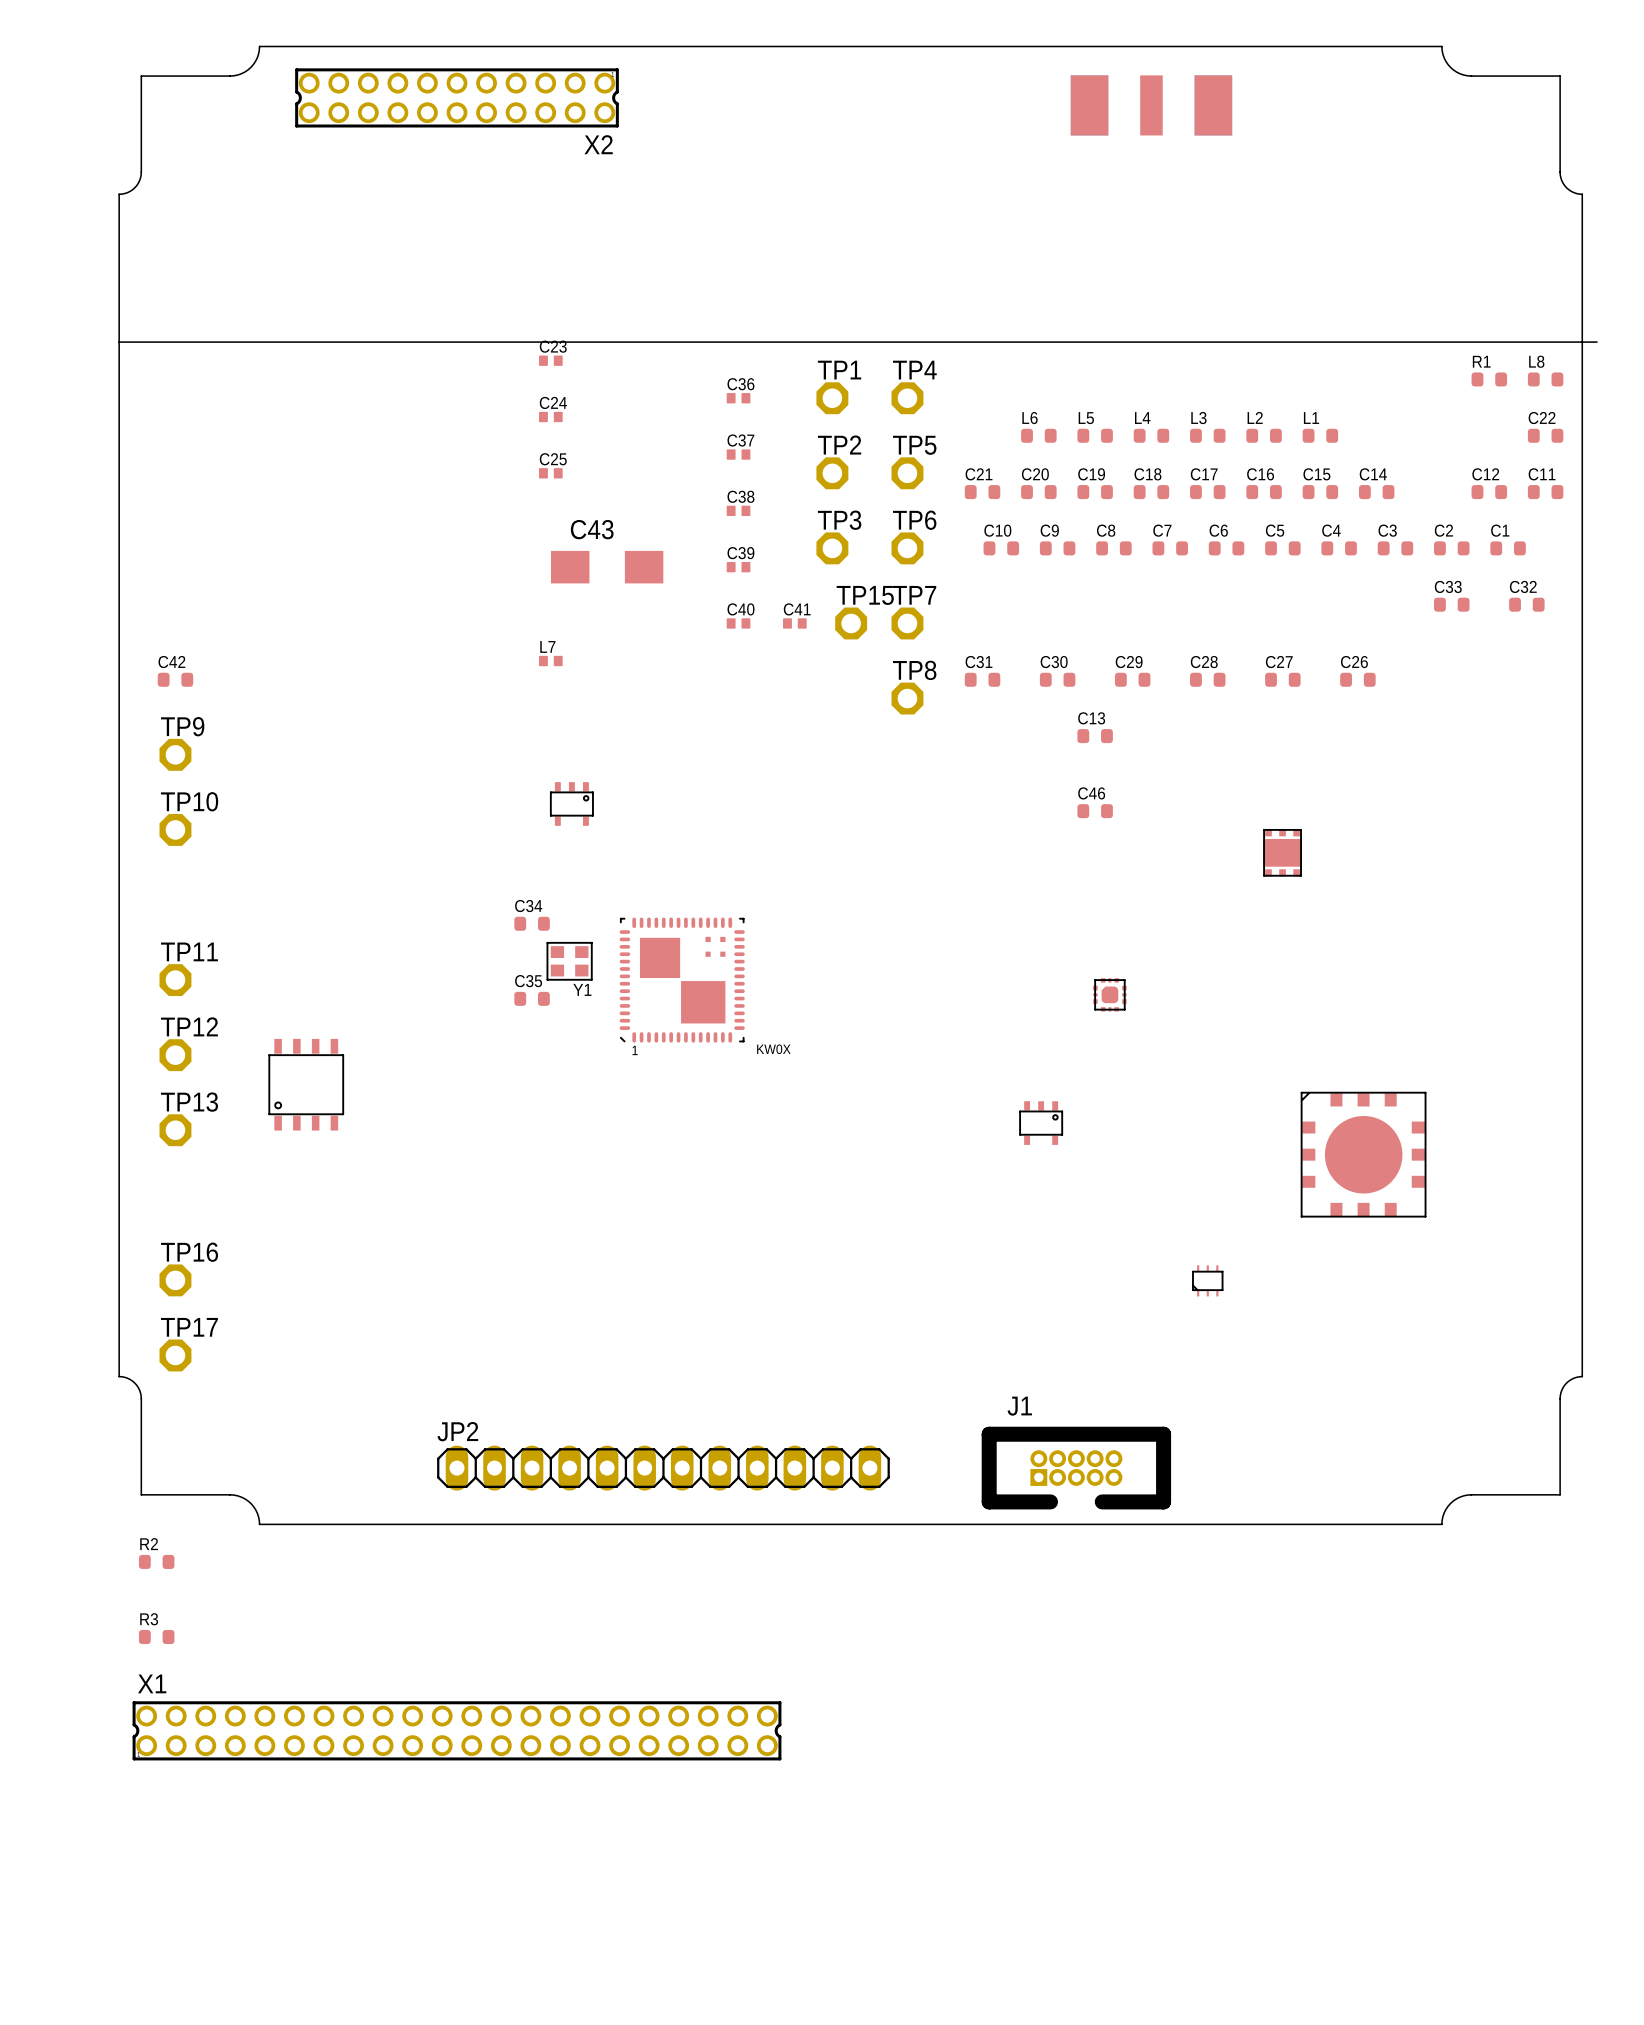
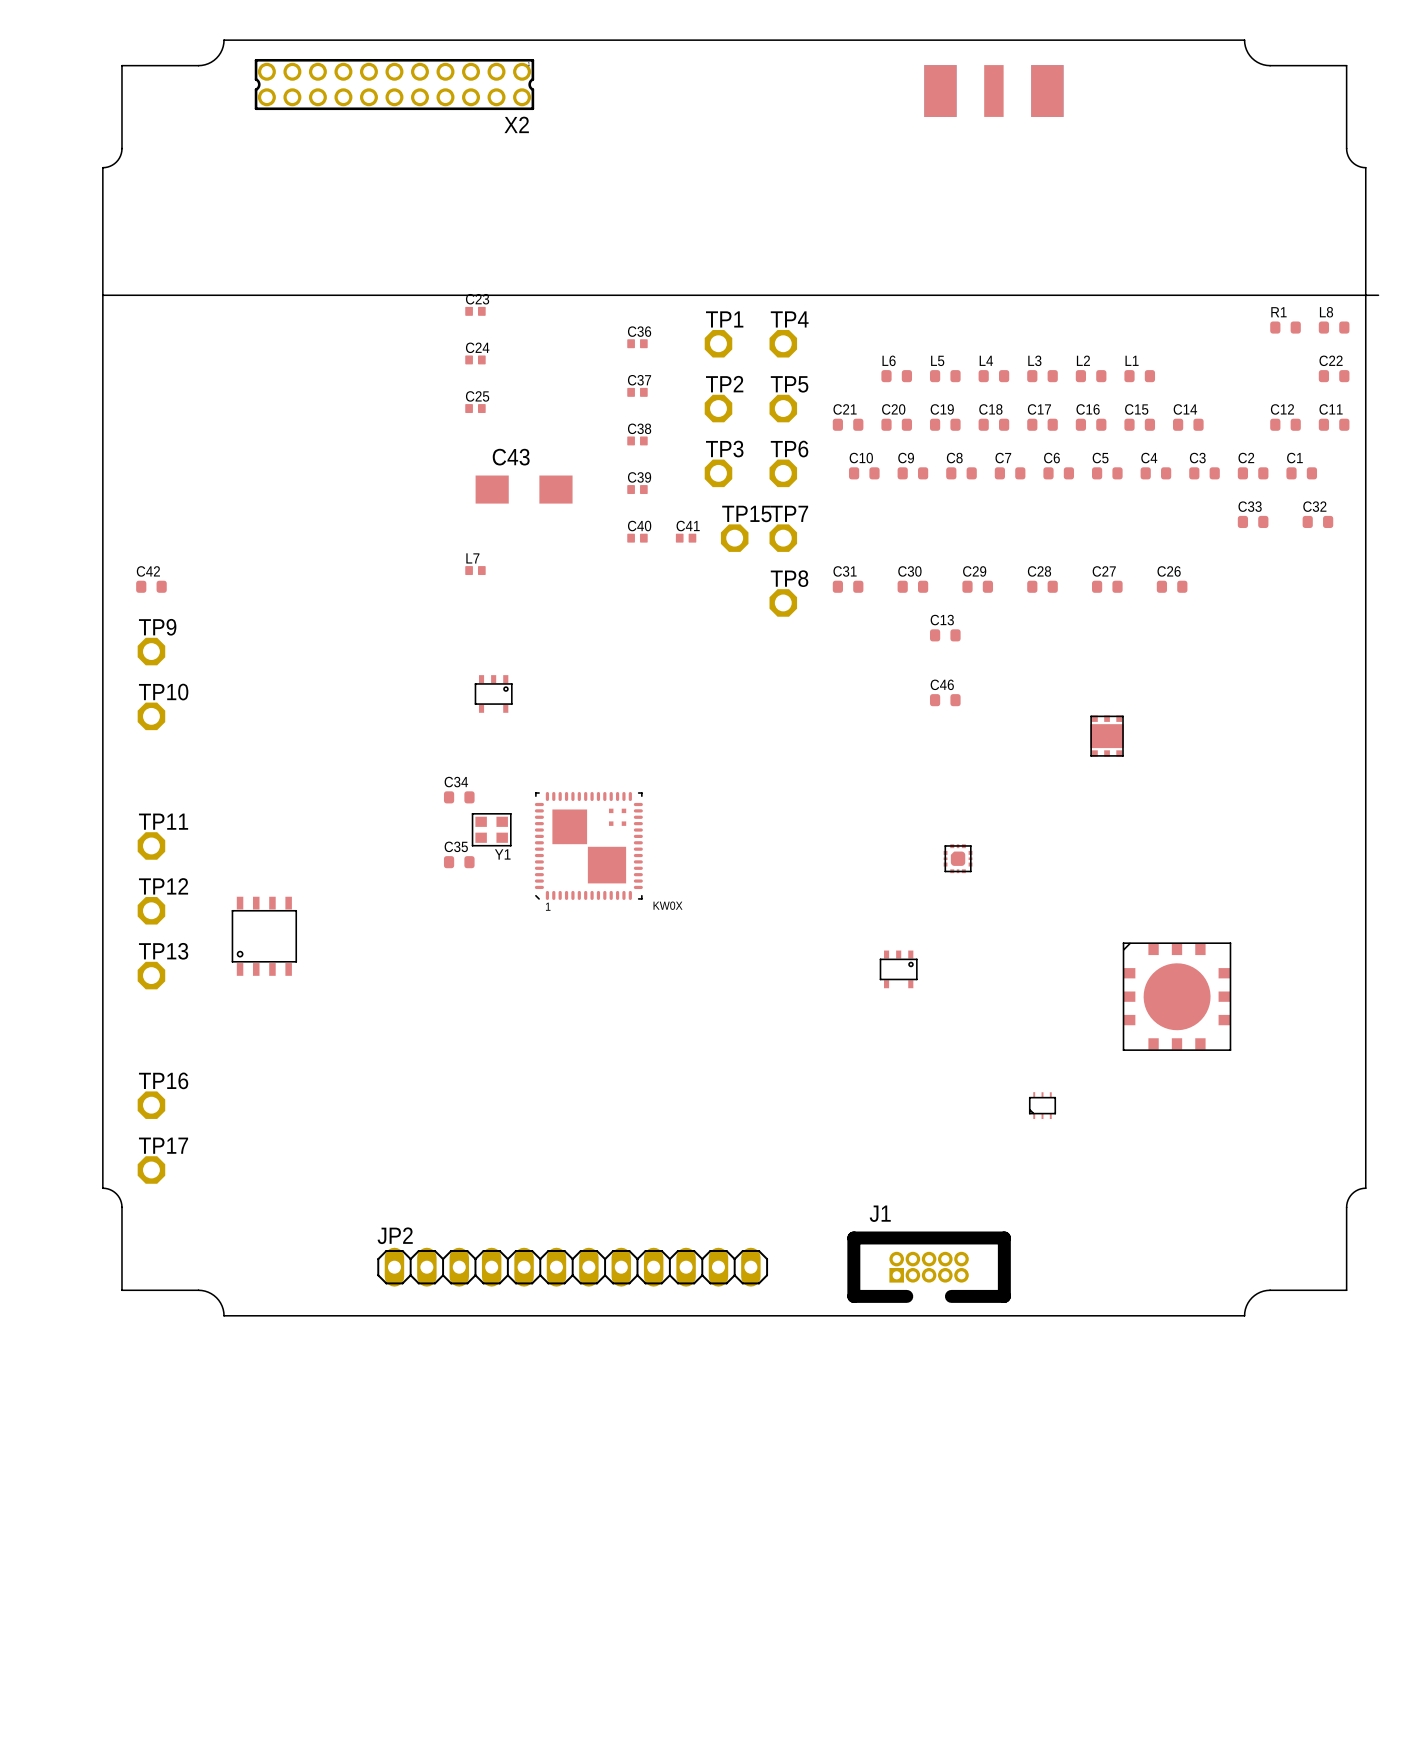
R2: (156, 1561) -> none
R3: (156, 1637) -> none
X1: (457, 1730) -> none

